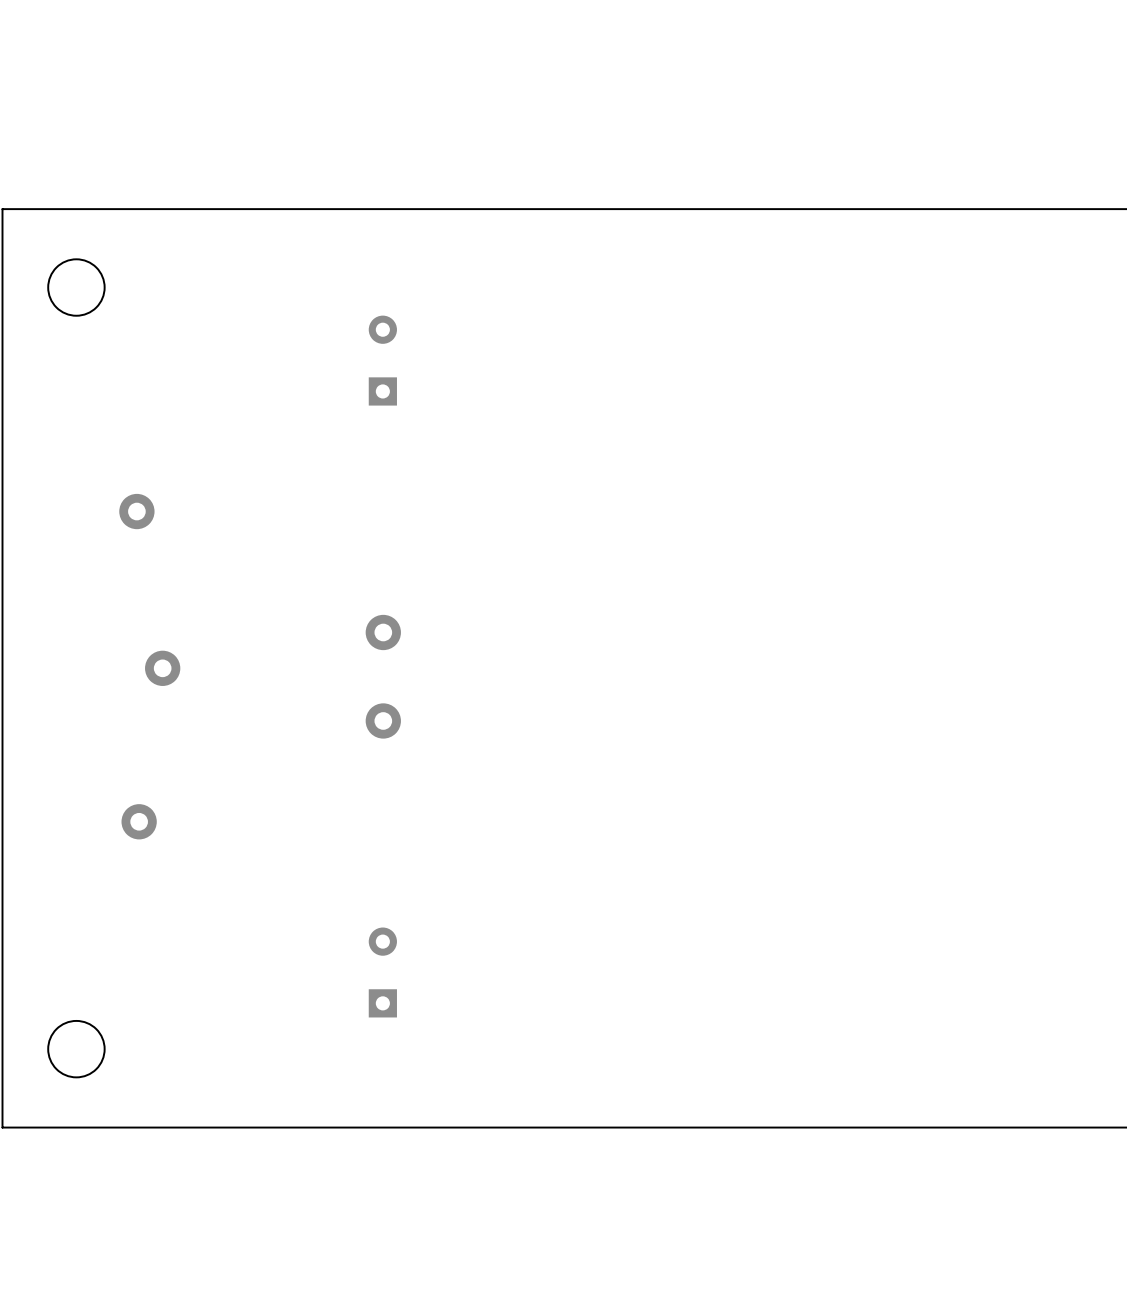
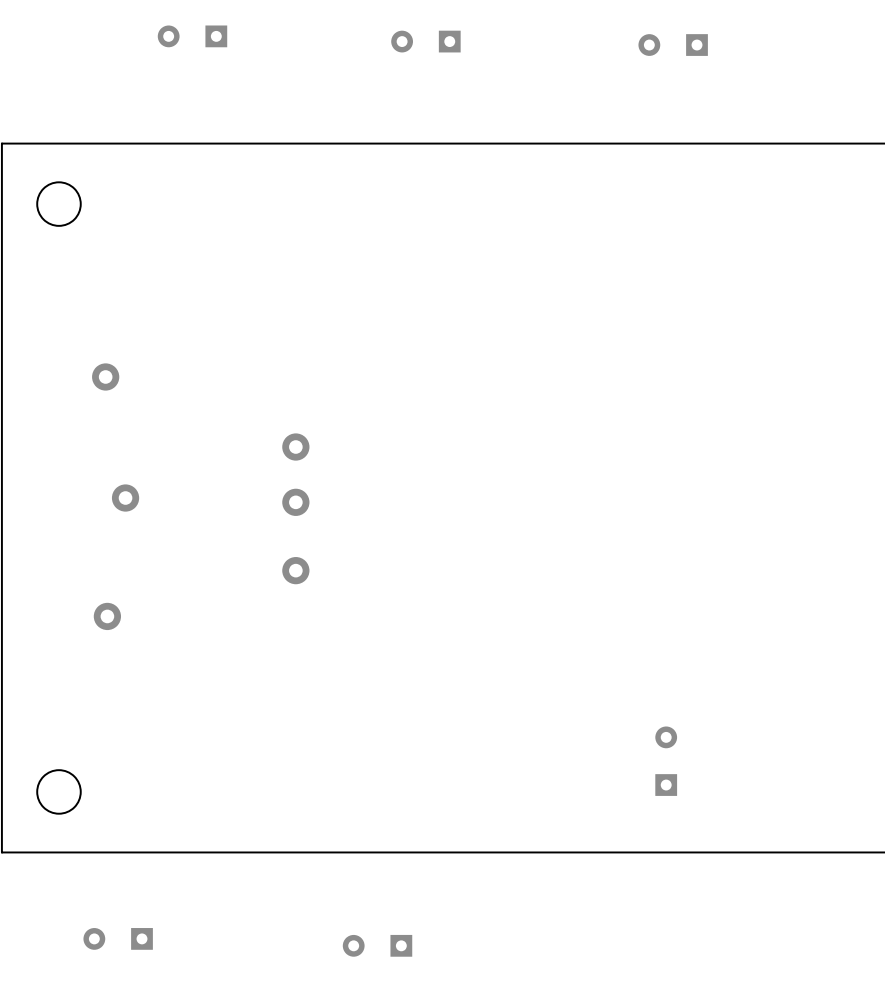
part: none -> (192, 36)
part: none -> (425, 41)
part: none -> (673, 45)
part: (382, 360) -> none
part: none -> (295, 447)
part: (383, 632) -> none
part: none -> (295, 502)
part: (383, 720) -> none
part: none -> (295, 570)
part: (382, 972) -> none
part: none -> (666, 761)
part: none -> (118, 938)
part: none -> (377, 945)

